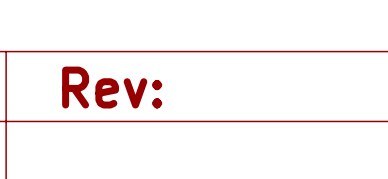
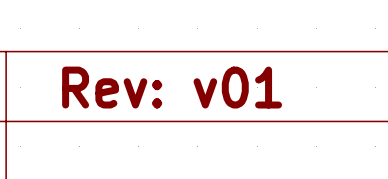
title block: Rev: (112, 87) -> Rev: v01 (172, 87)

